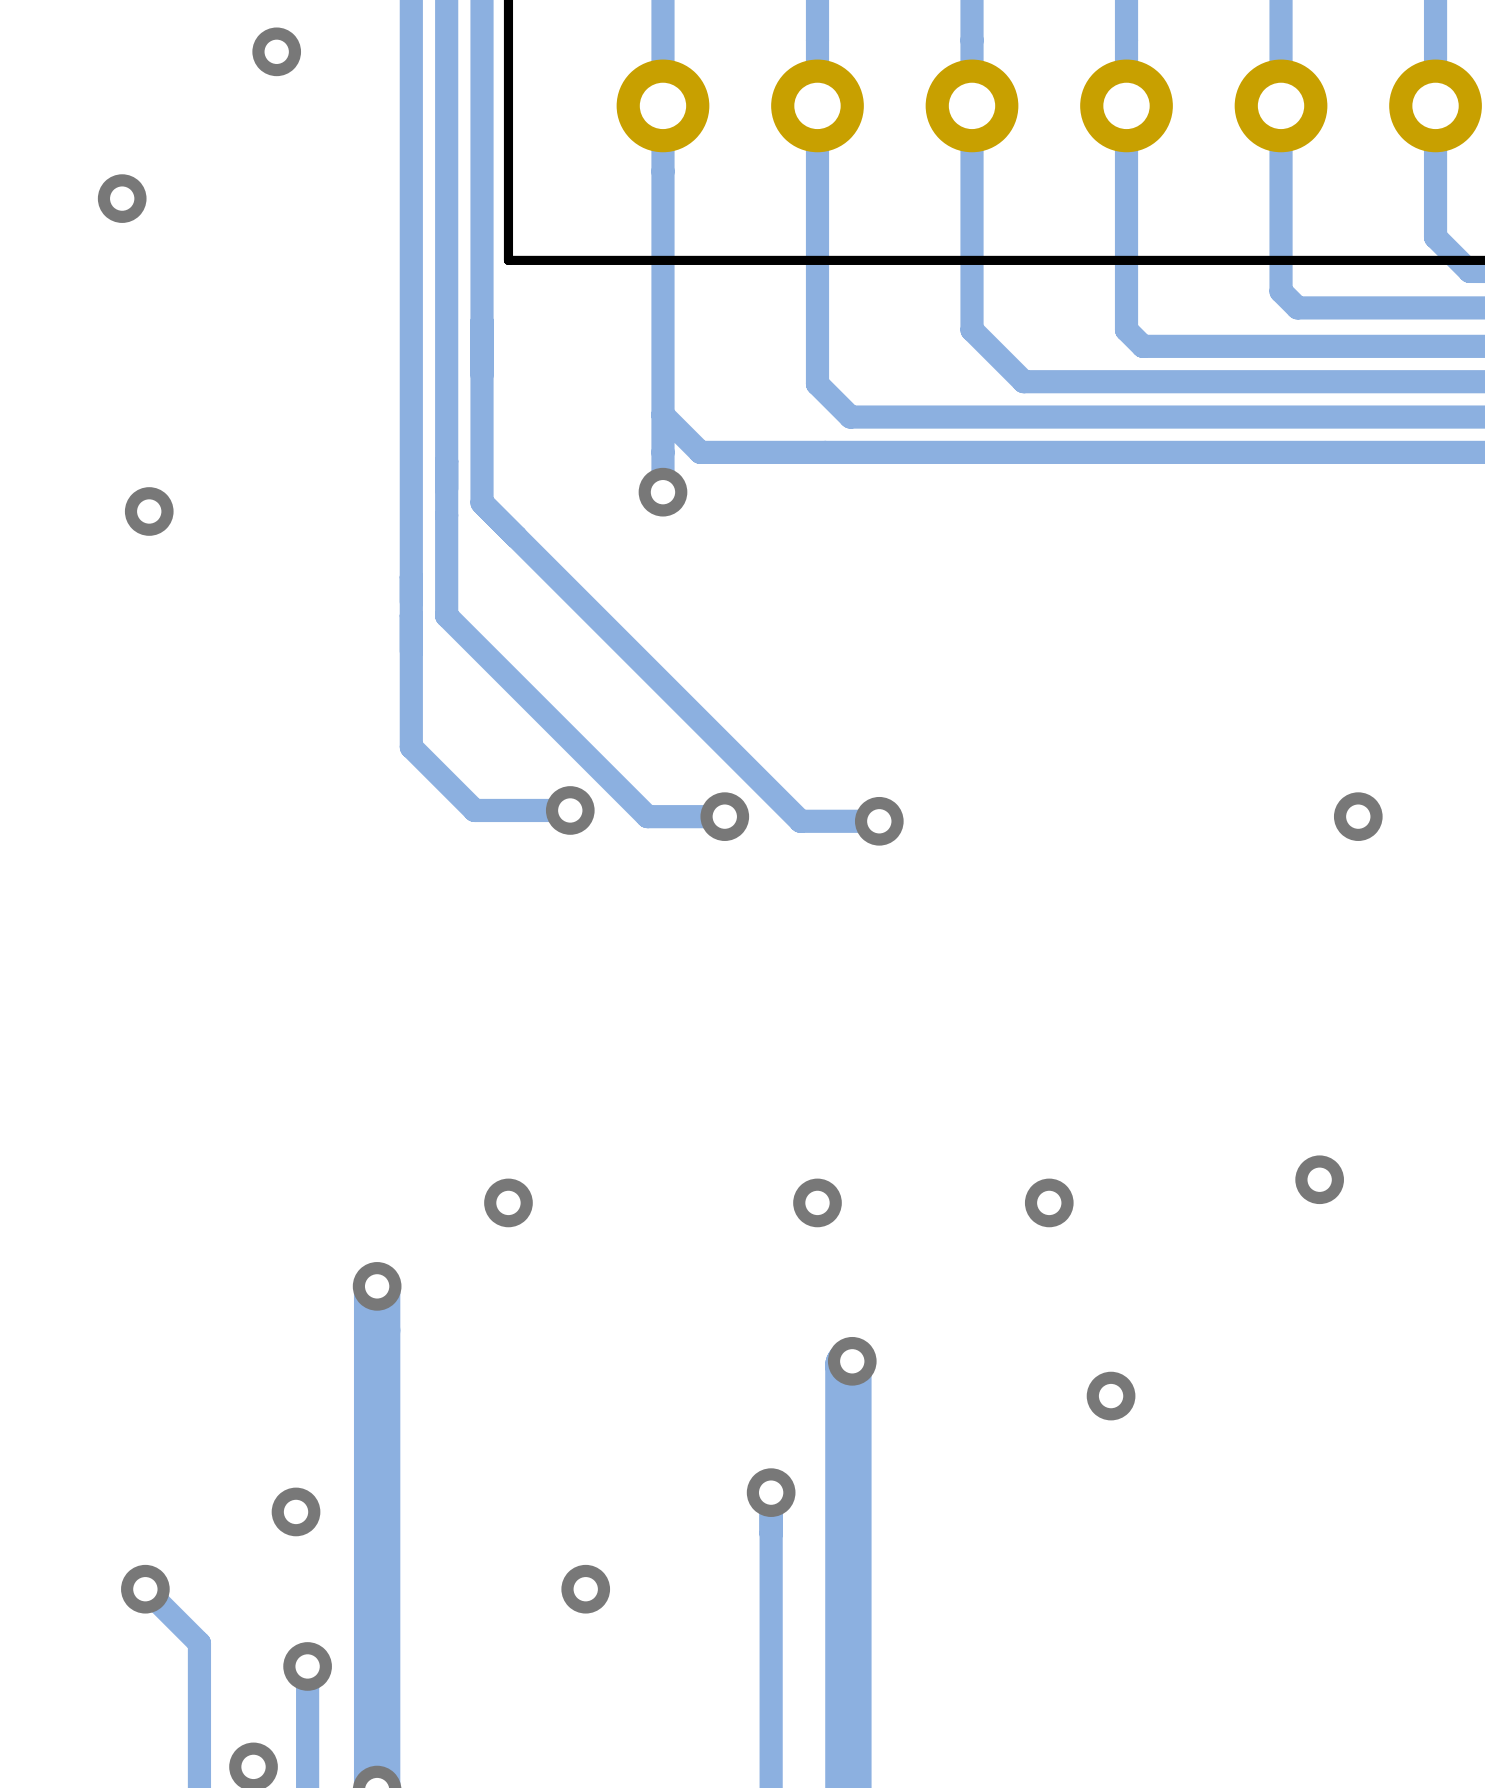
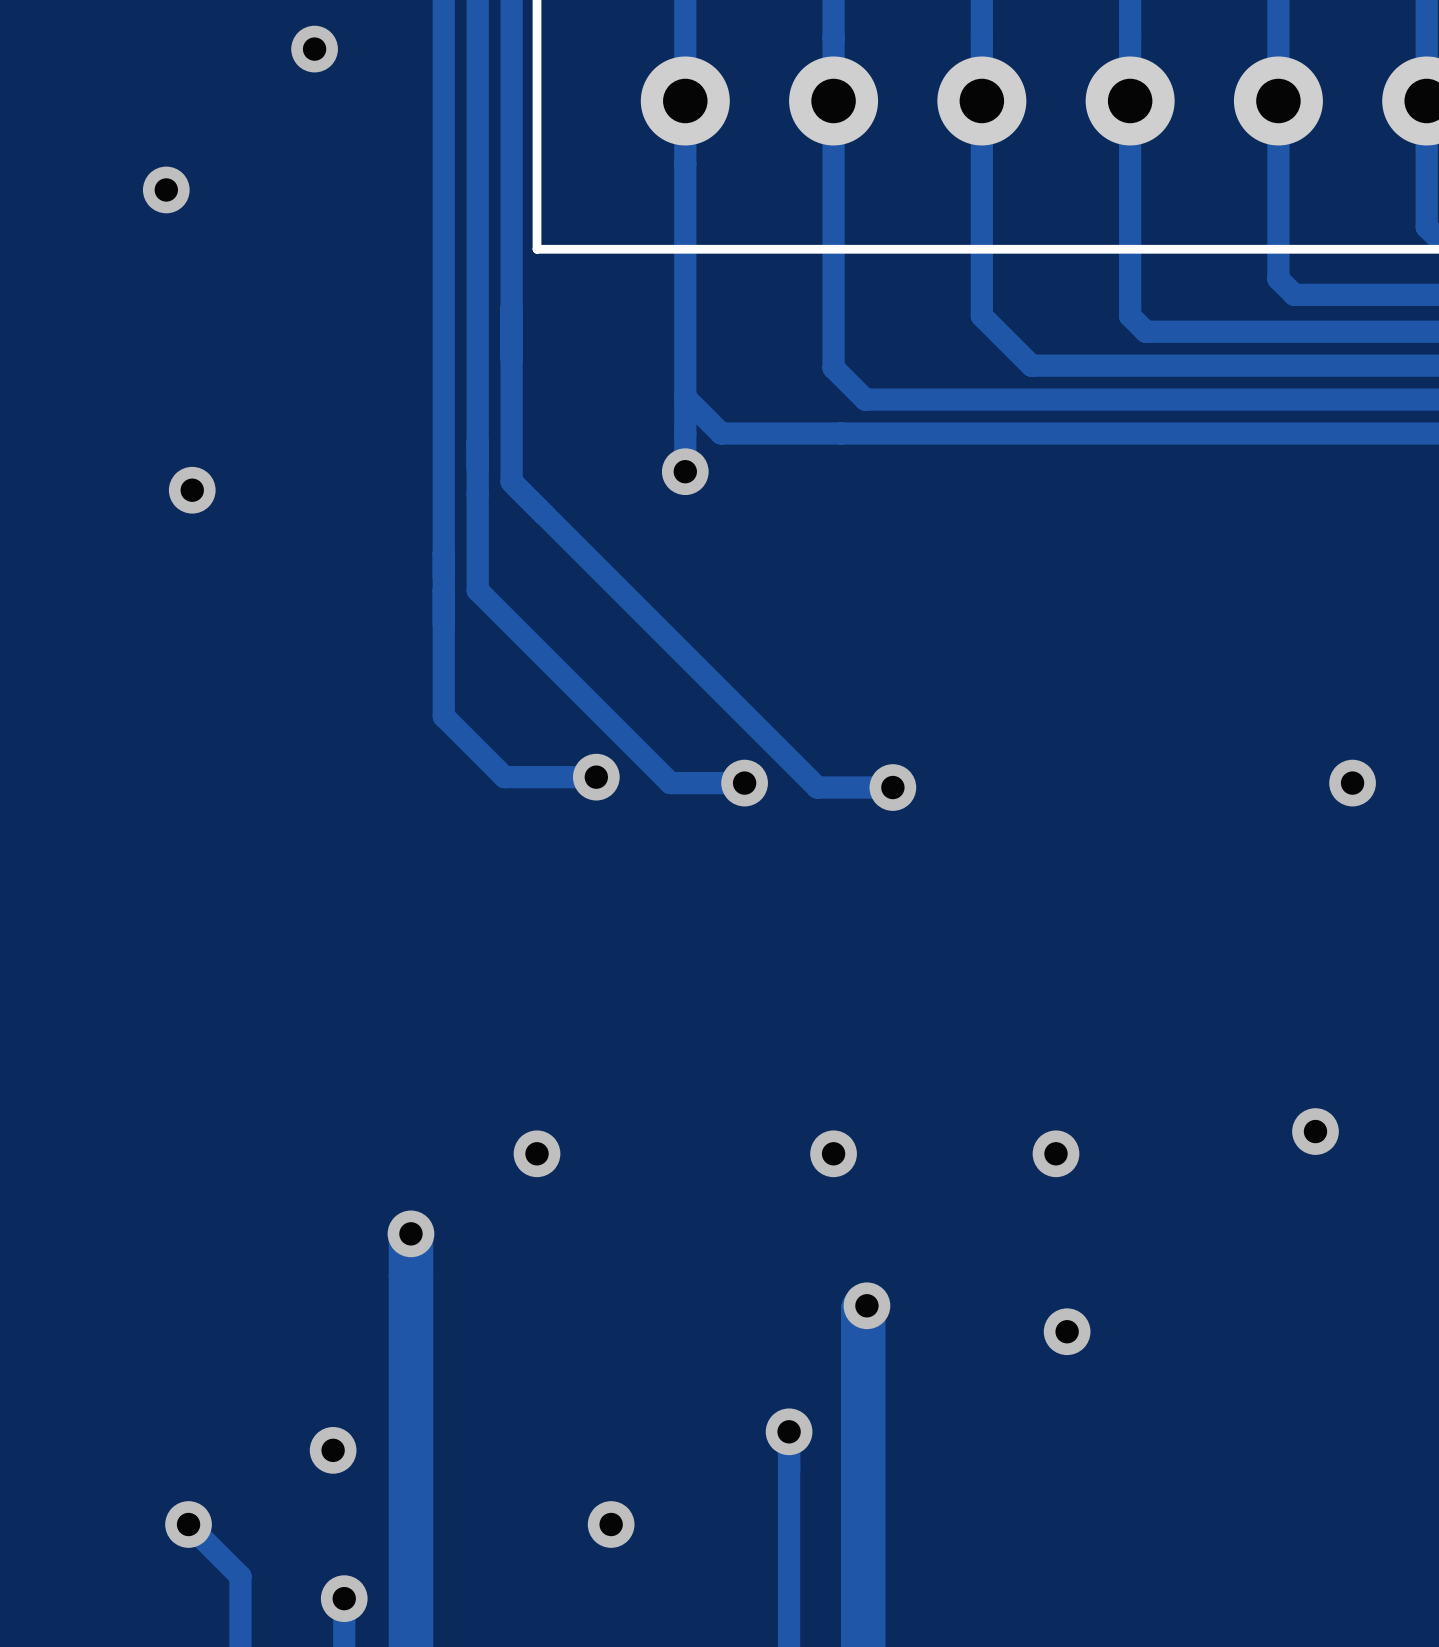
via position: (1111, 1396) -> (1067, 1331)

